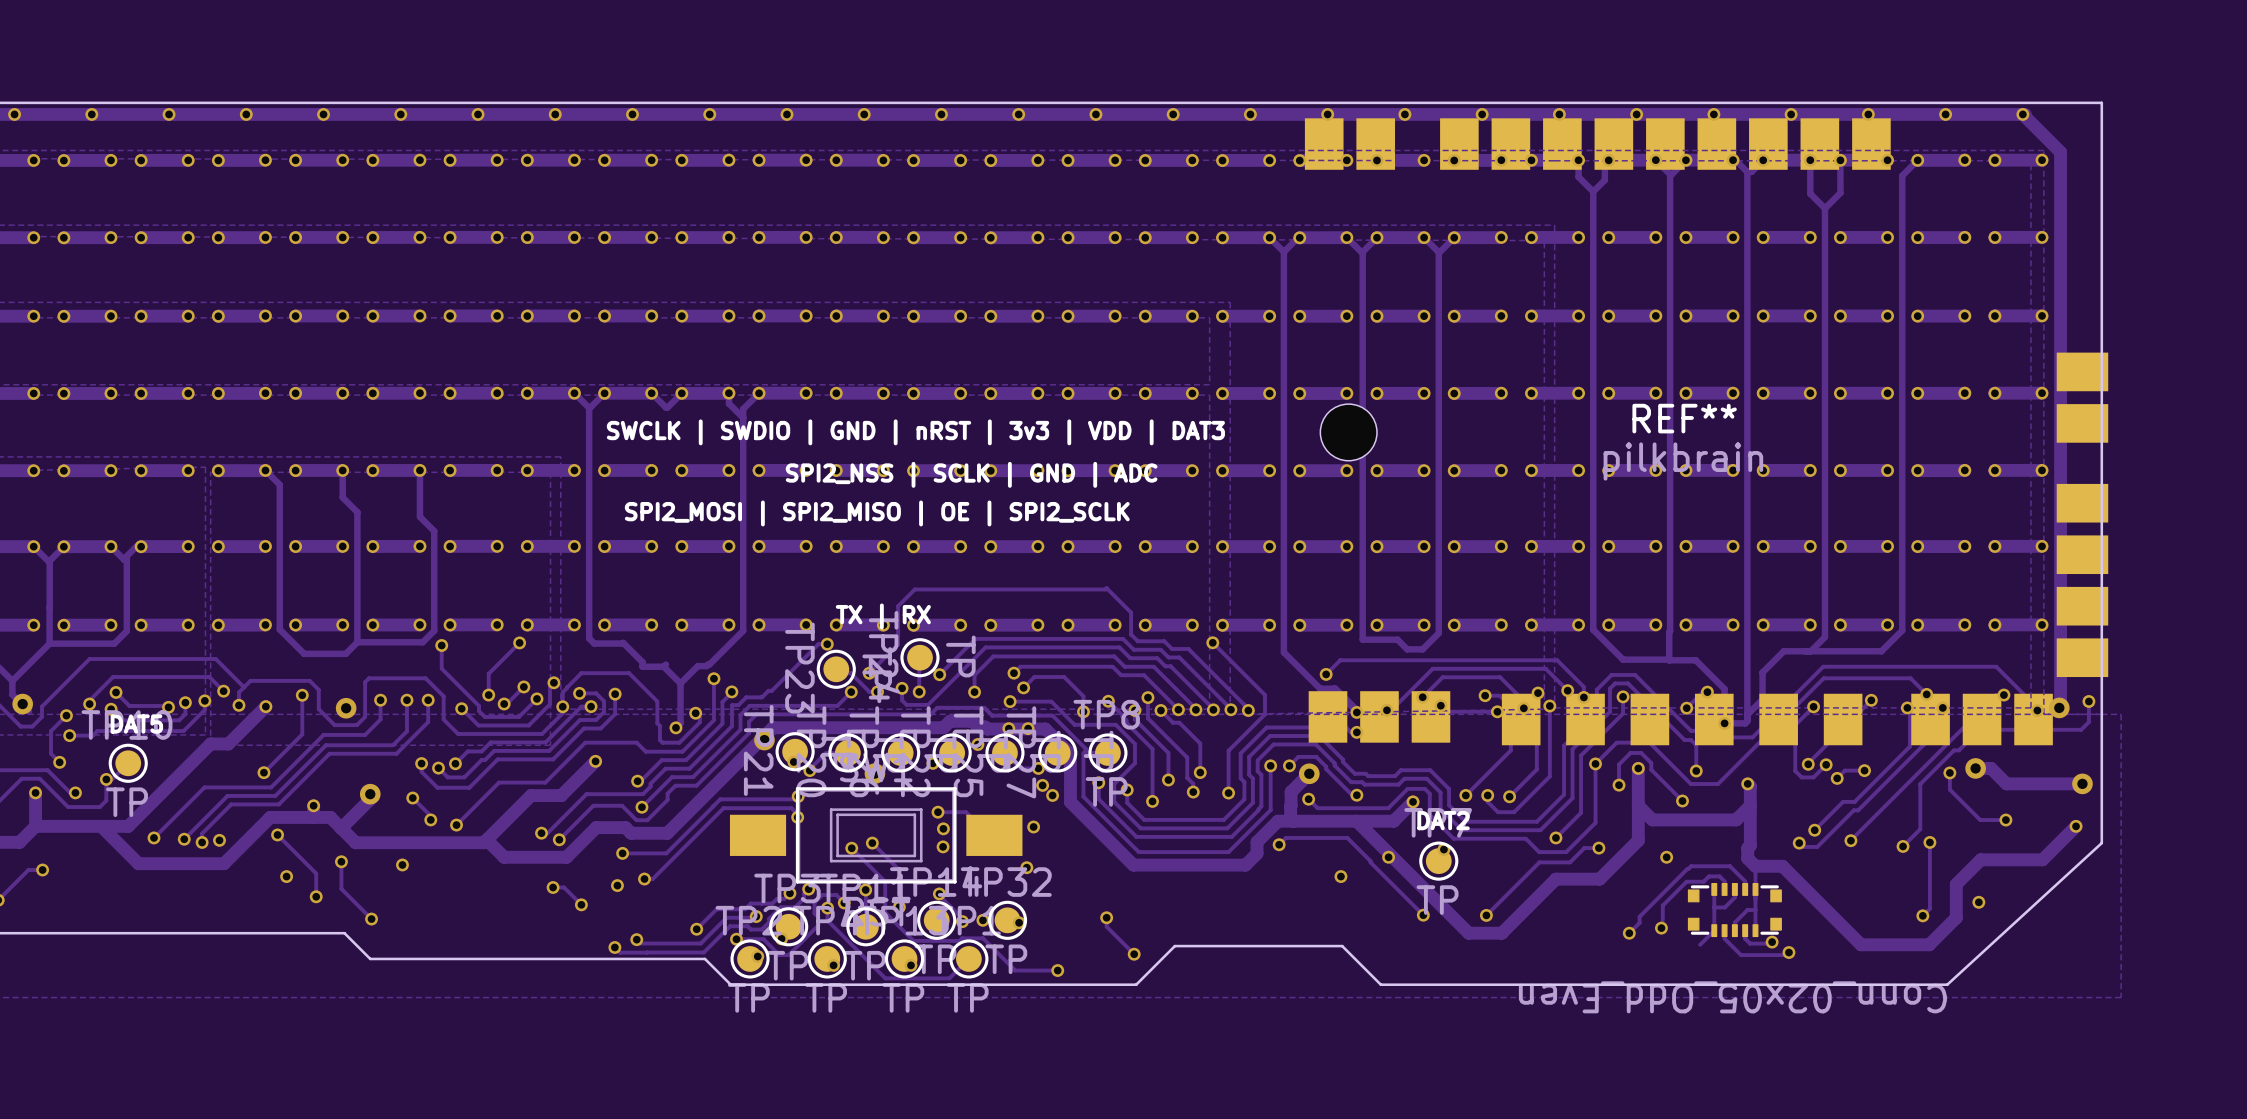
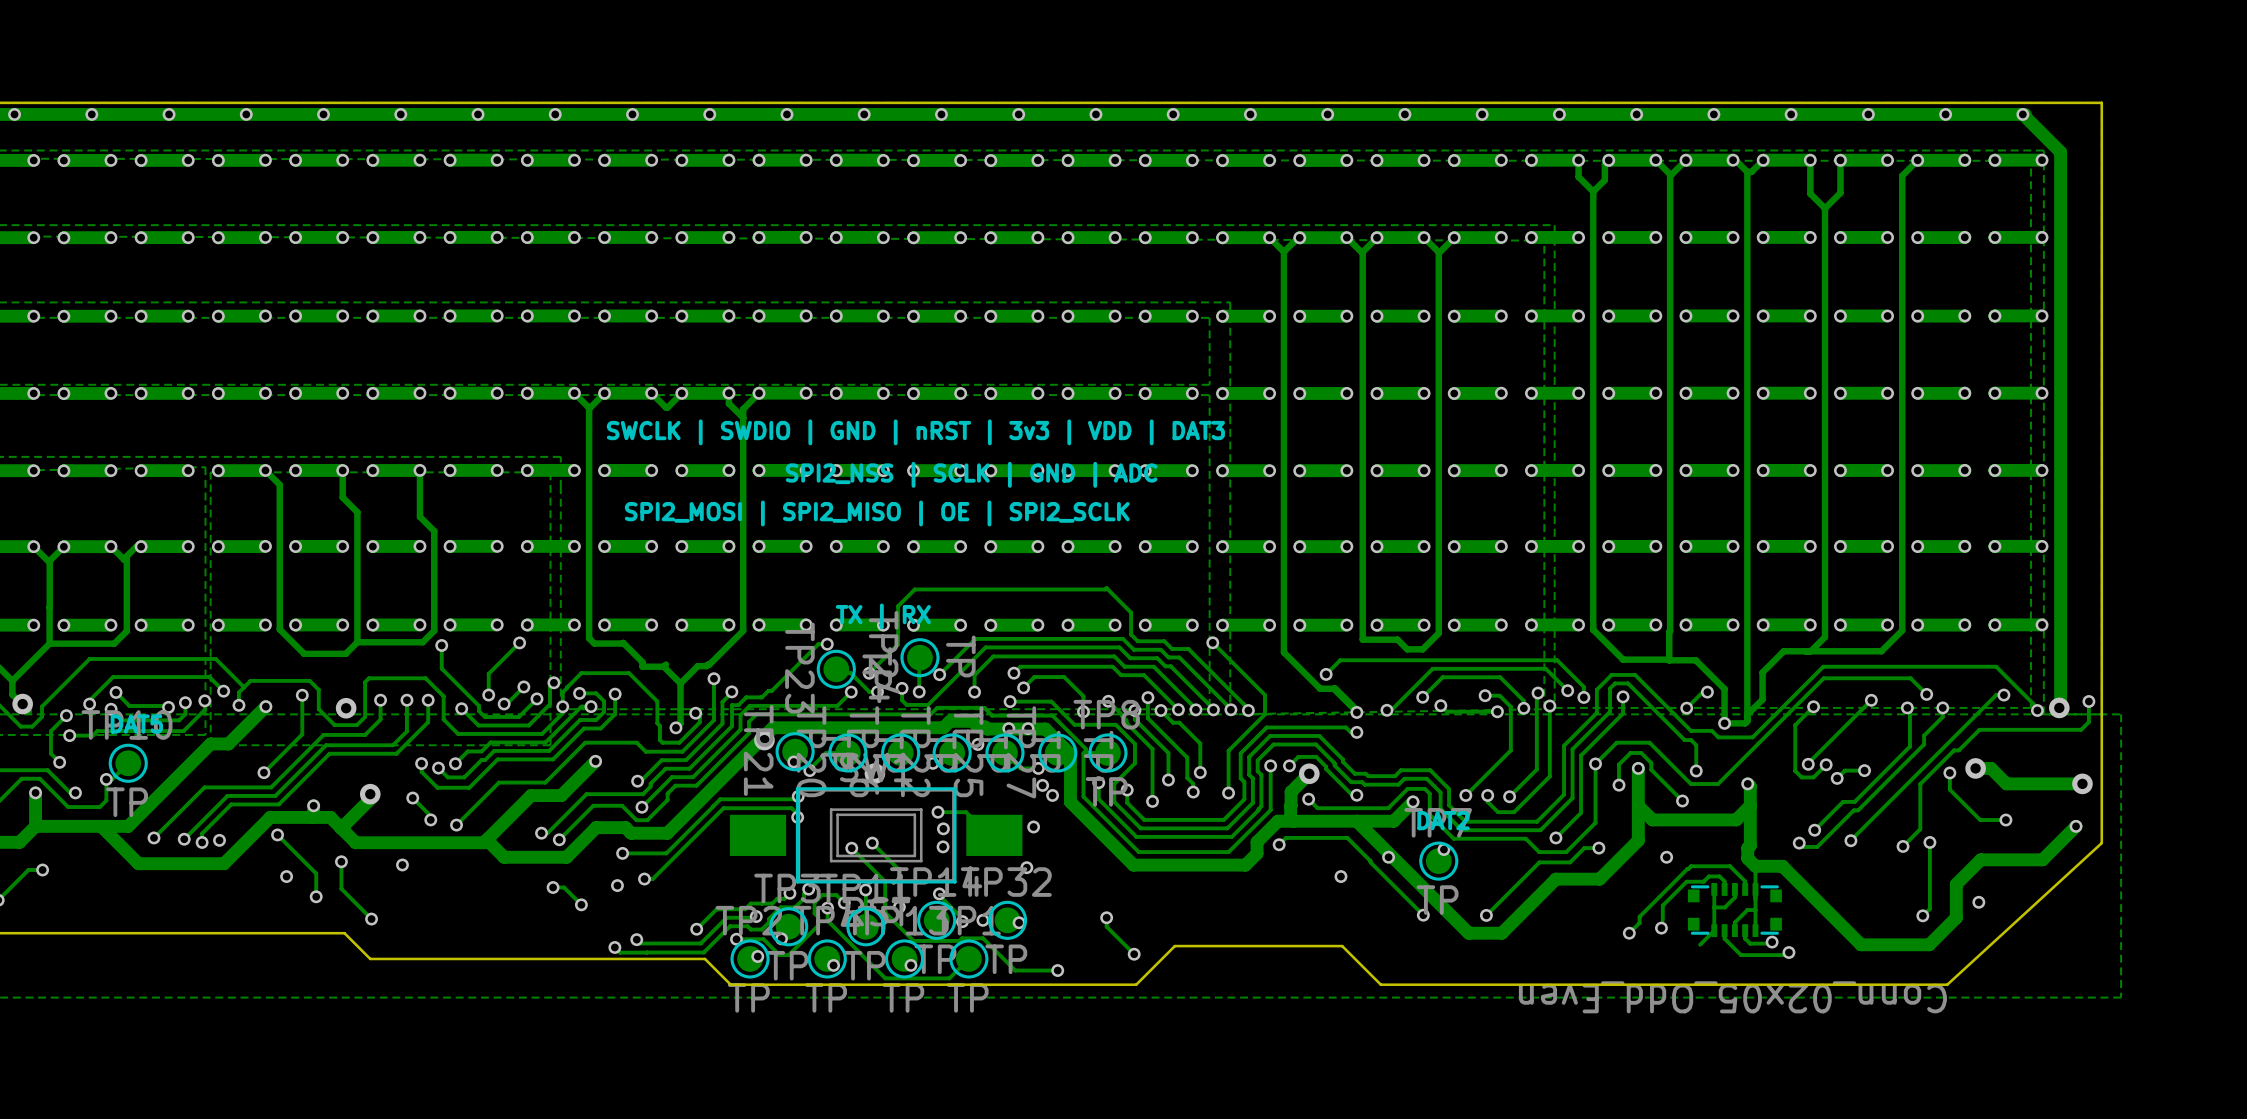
REF**: pilkbrain (1706, 431) -> none

